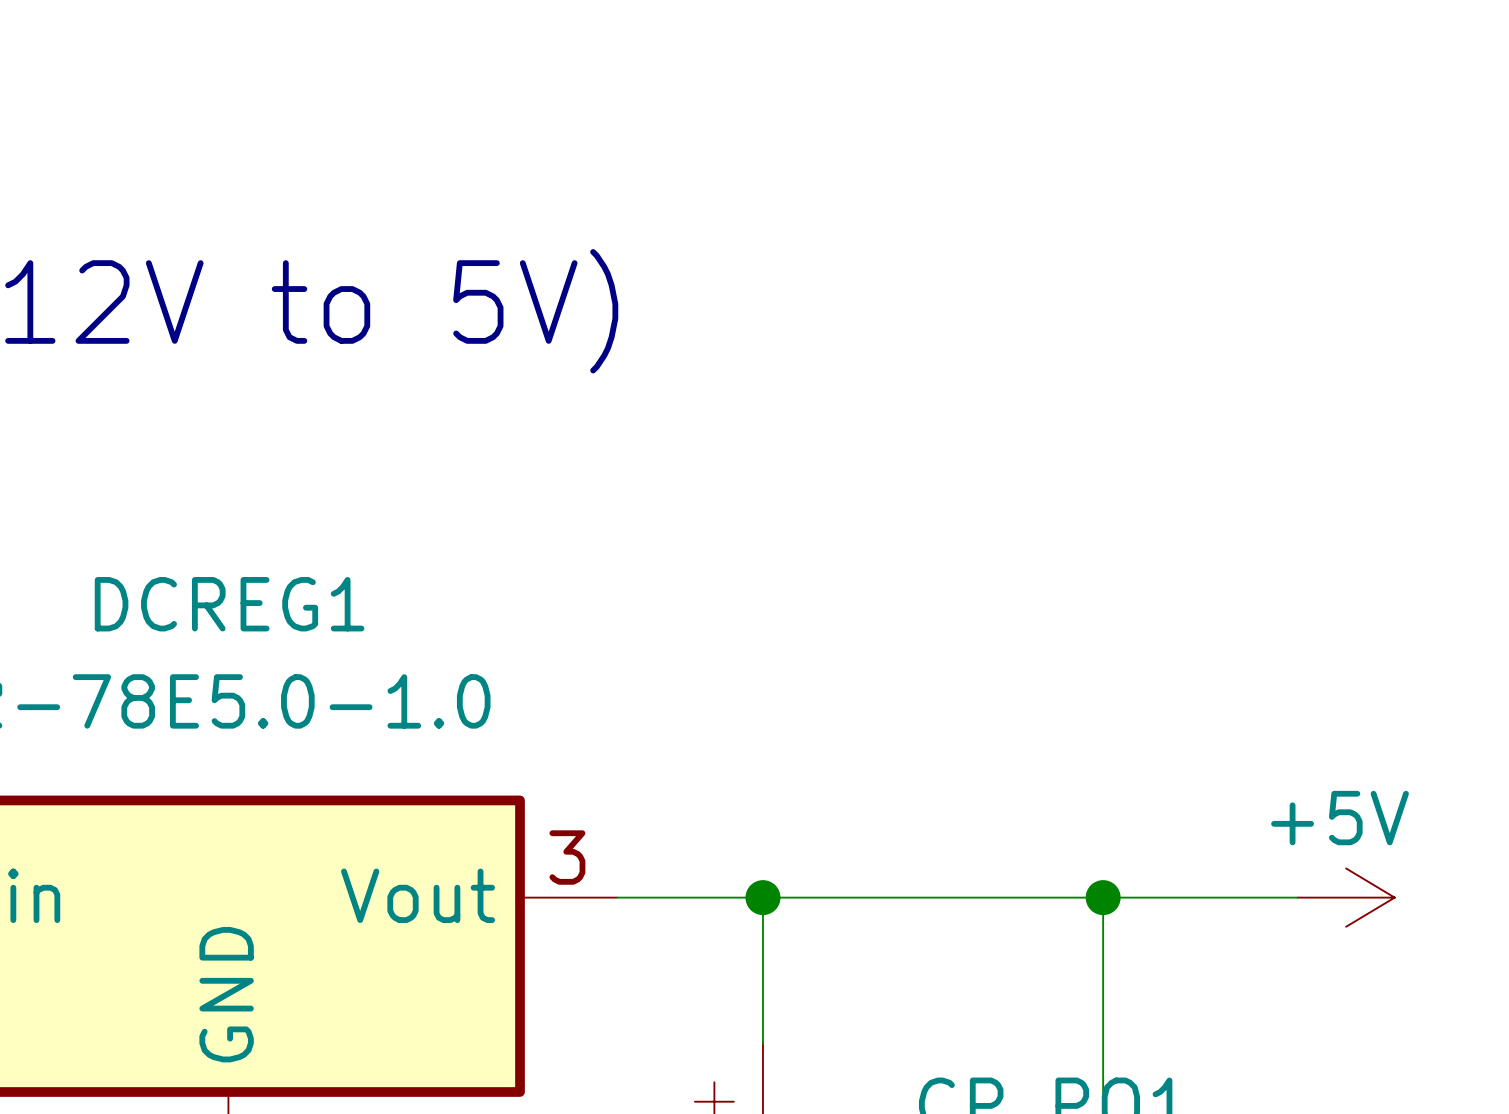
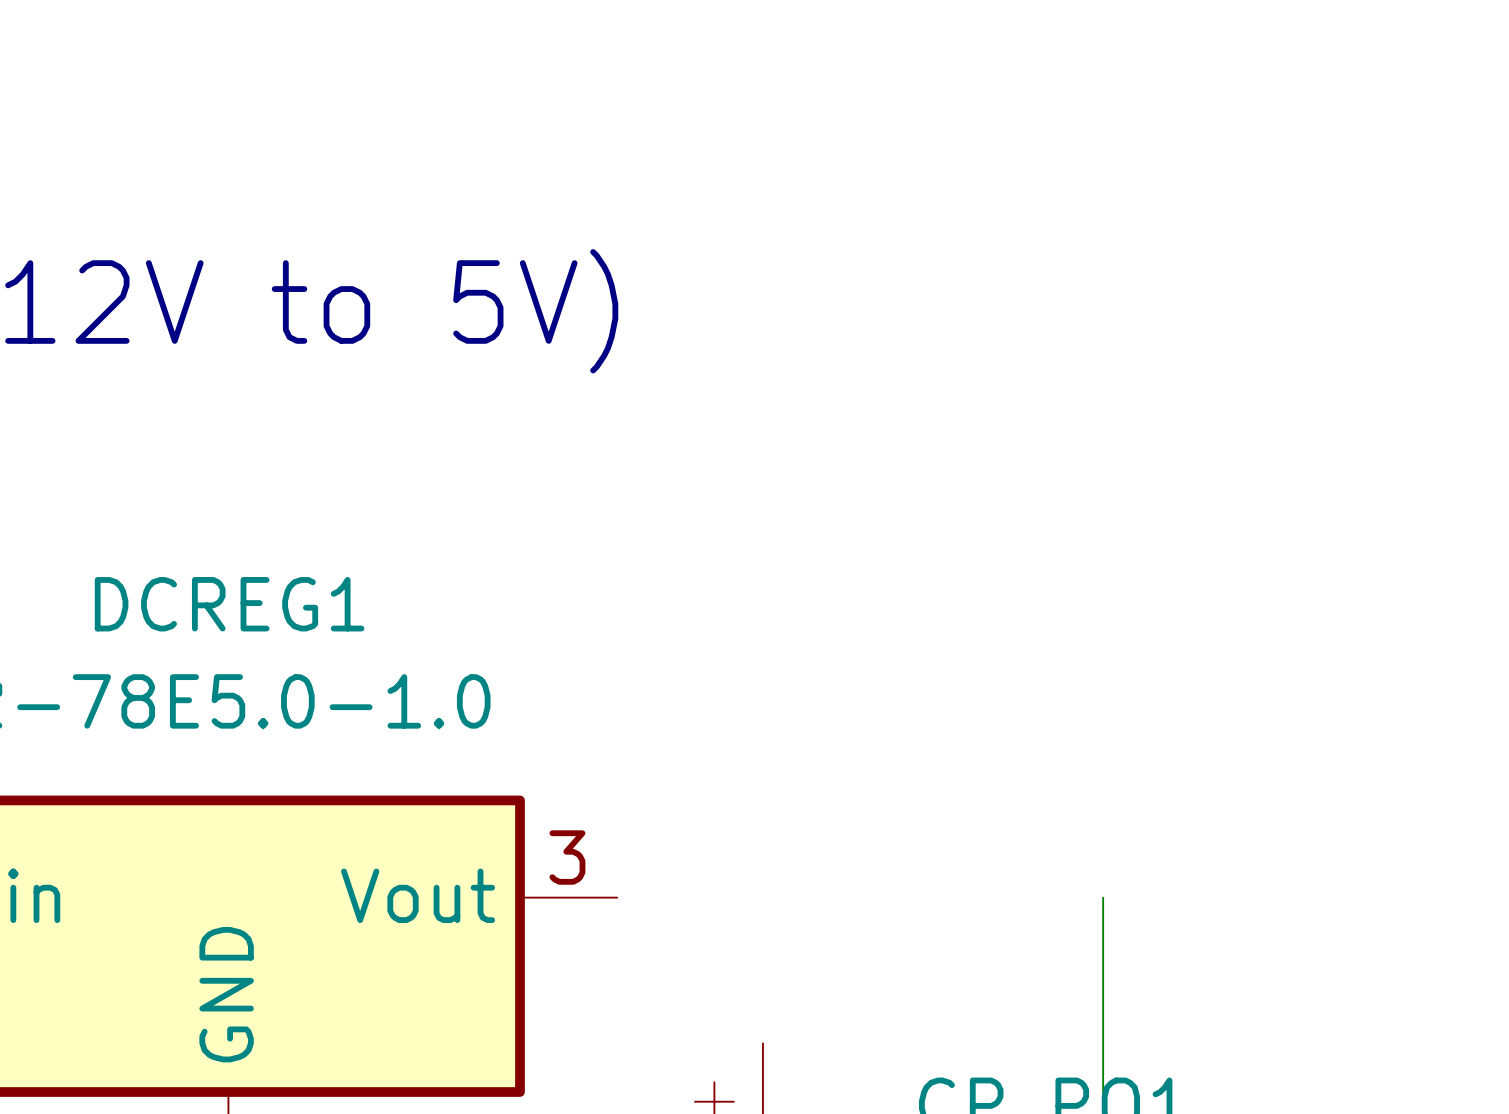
wire: (617, 897) (1297, 897) -> none
wire: (762, 897) (762, 1043) -> none
junction: (762, 897) -> none
junction: (1103, 897) -> none
power symbol: +5V (1346, 897) -> none

